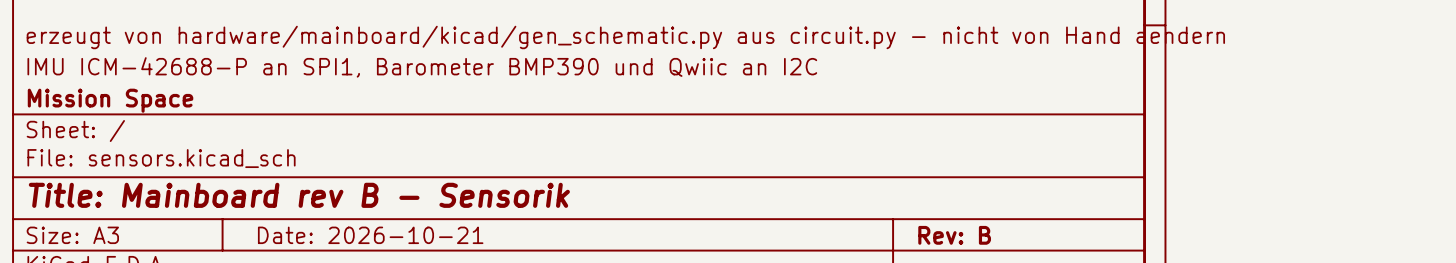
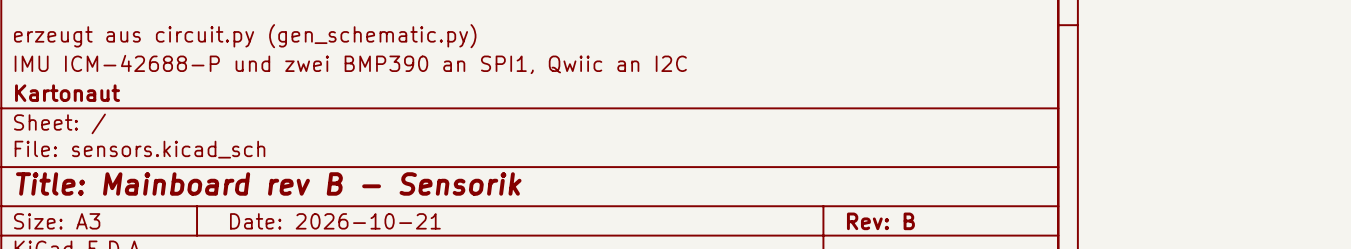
title block: erzeugt von hardware/mainboard/kicad/gen_schematic.py aus circuit.py - nicht von Hand aendern (625, 37) -> erzeugt aus circuit.py (gen_schematic.py) (245, 36)
title block: IMU ICM-42688-P an SPI1, Barometer BMP390 und Qwiic an I2C (422, 67) -> IMU ICM-42688-P und zwei BMP390 an SPI1, Qwiic an I2C (350, 64)
title block: Mission Space (110, 100) -> Kartonaut (67, 93)

